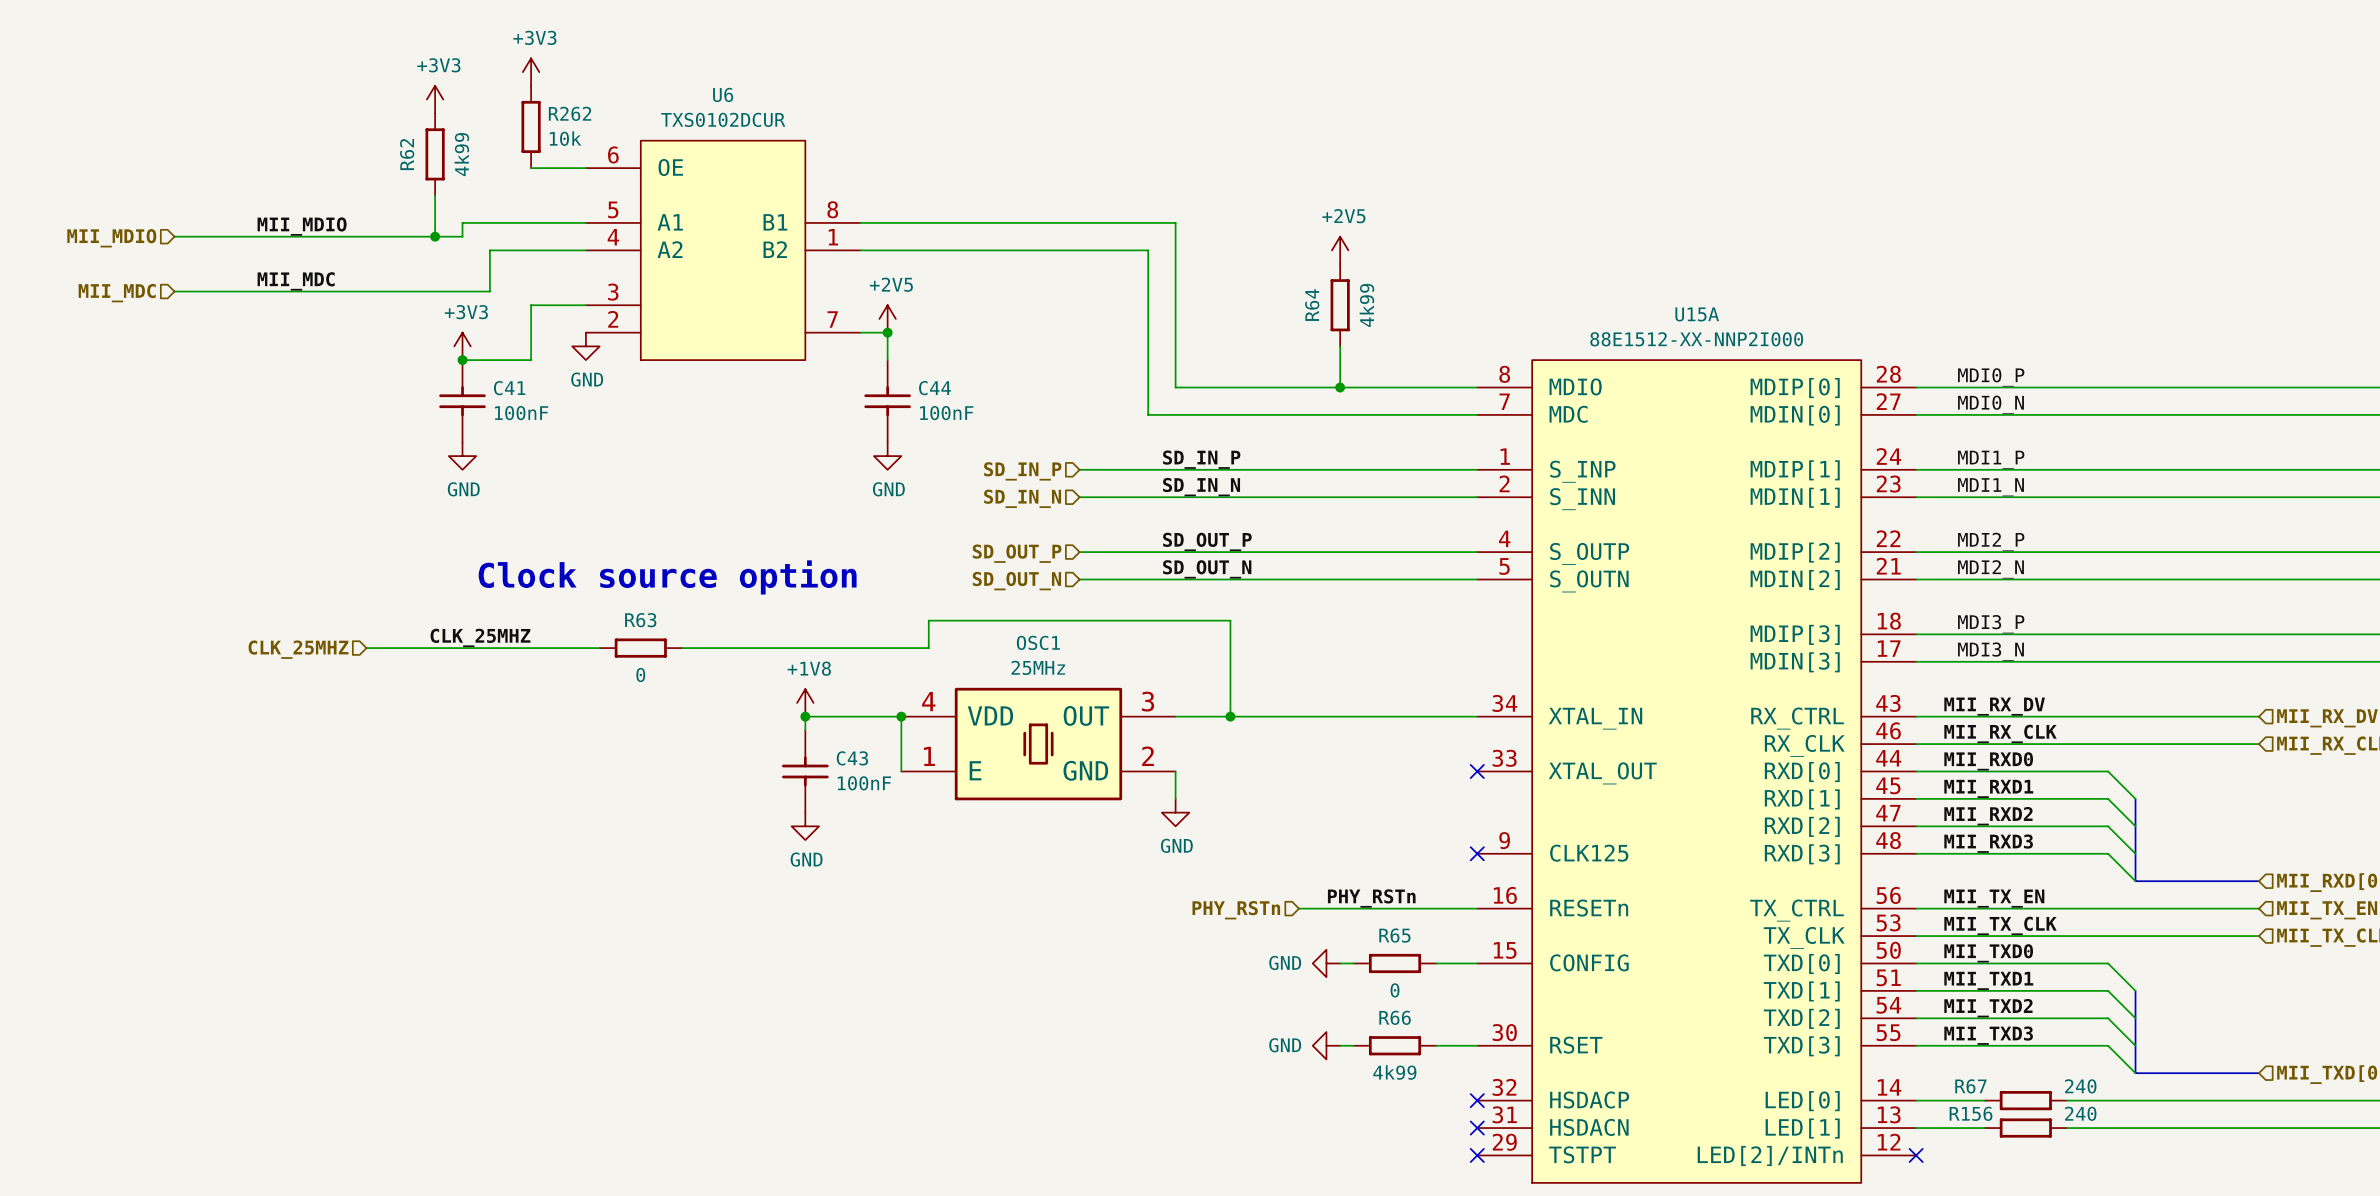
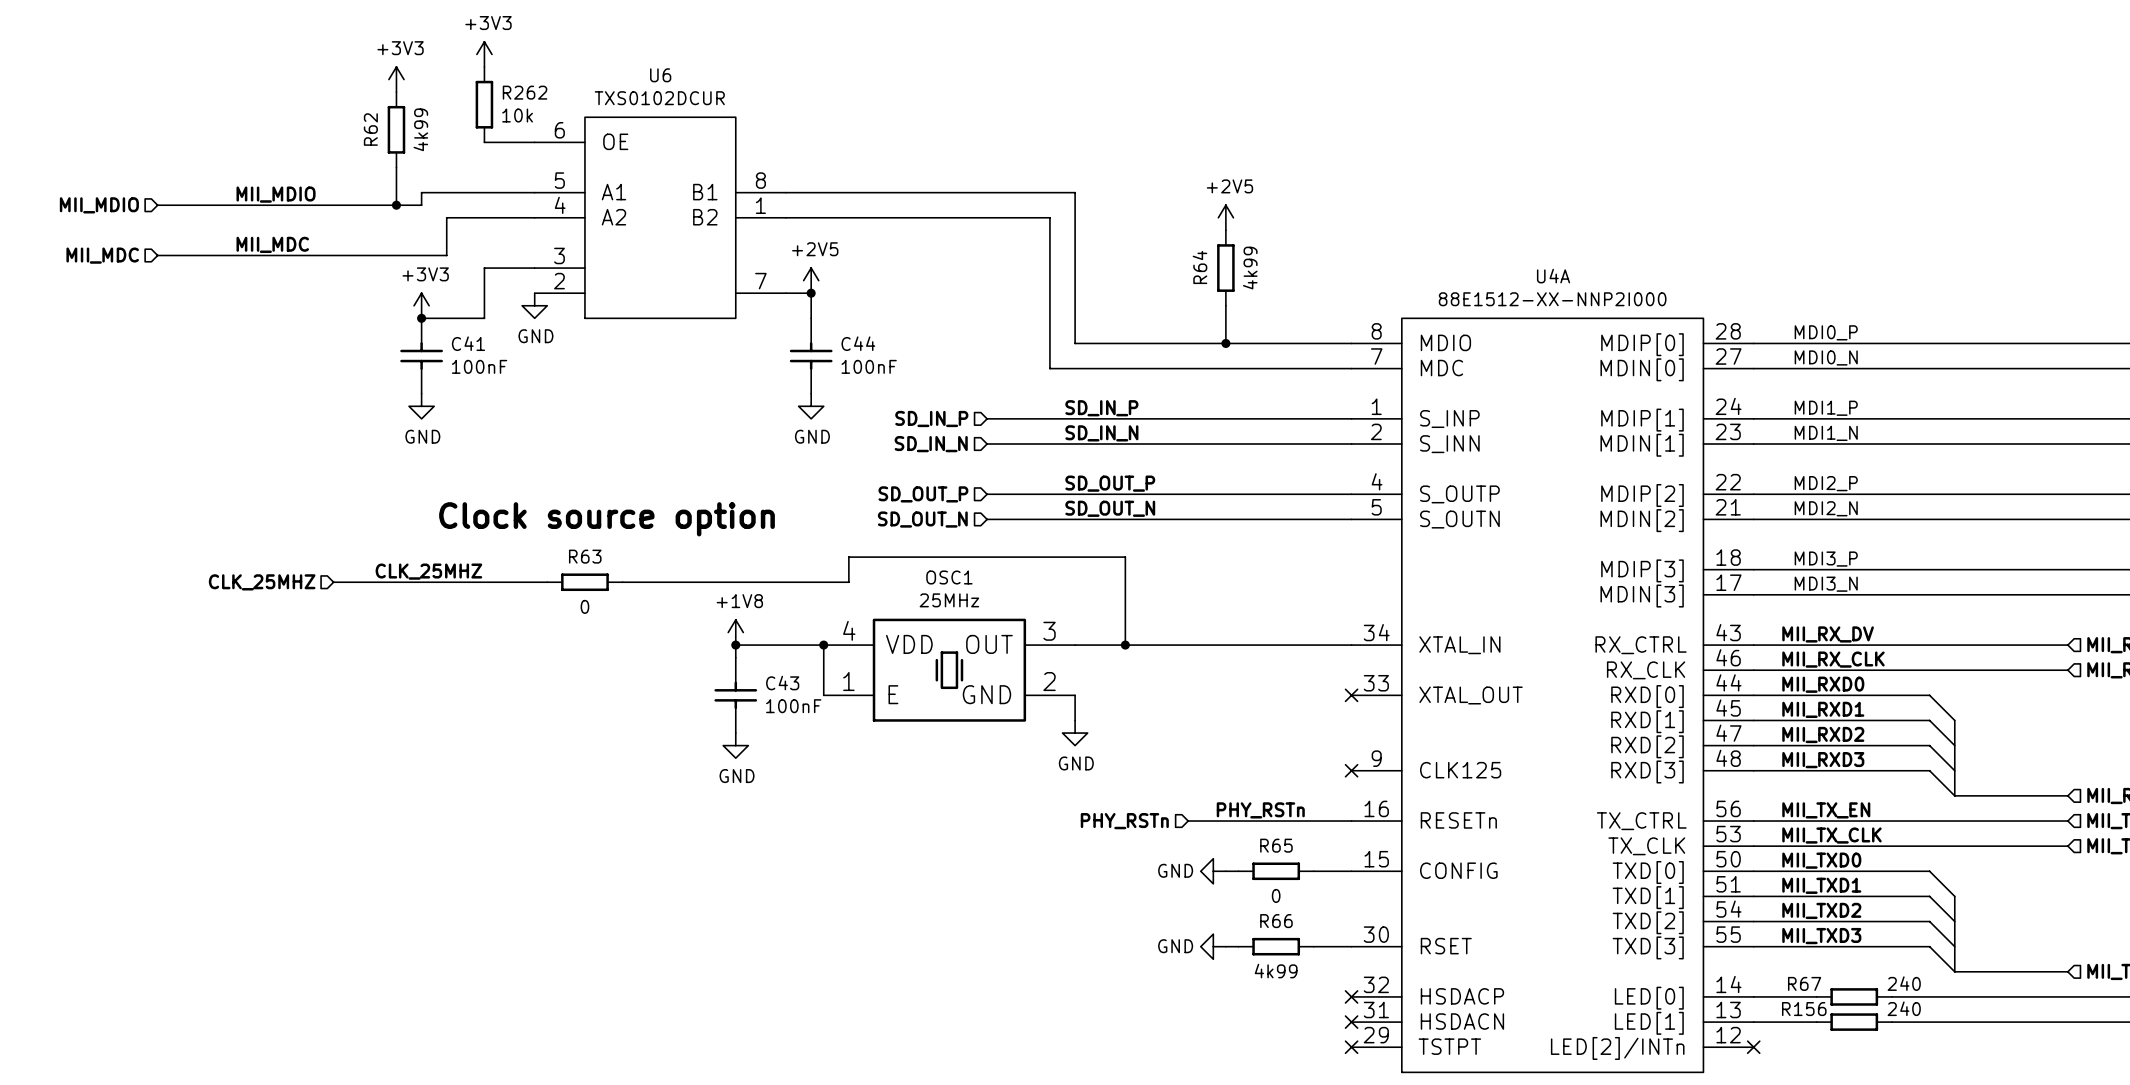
U15A name: U15A (1697, 314) -> U4A (1553, 276)

